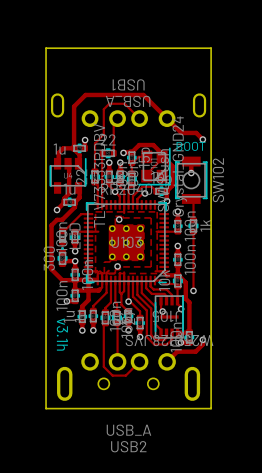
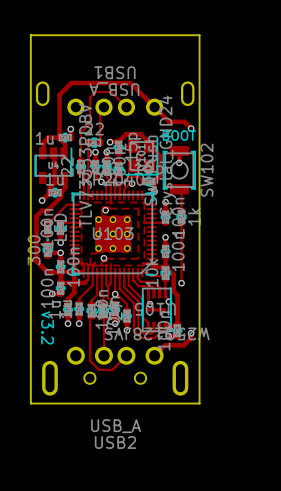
text: v3.1h (62, 334) -> v3.2 (47, 327)

